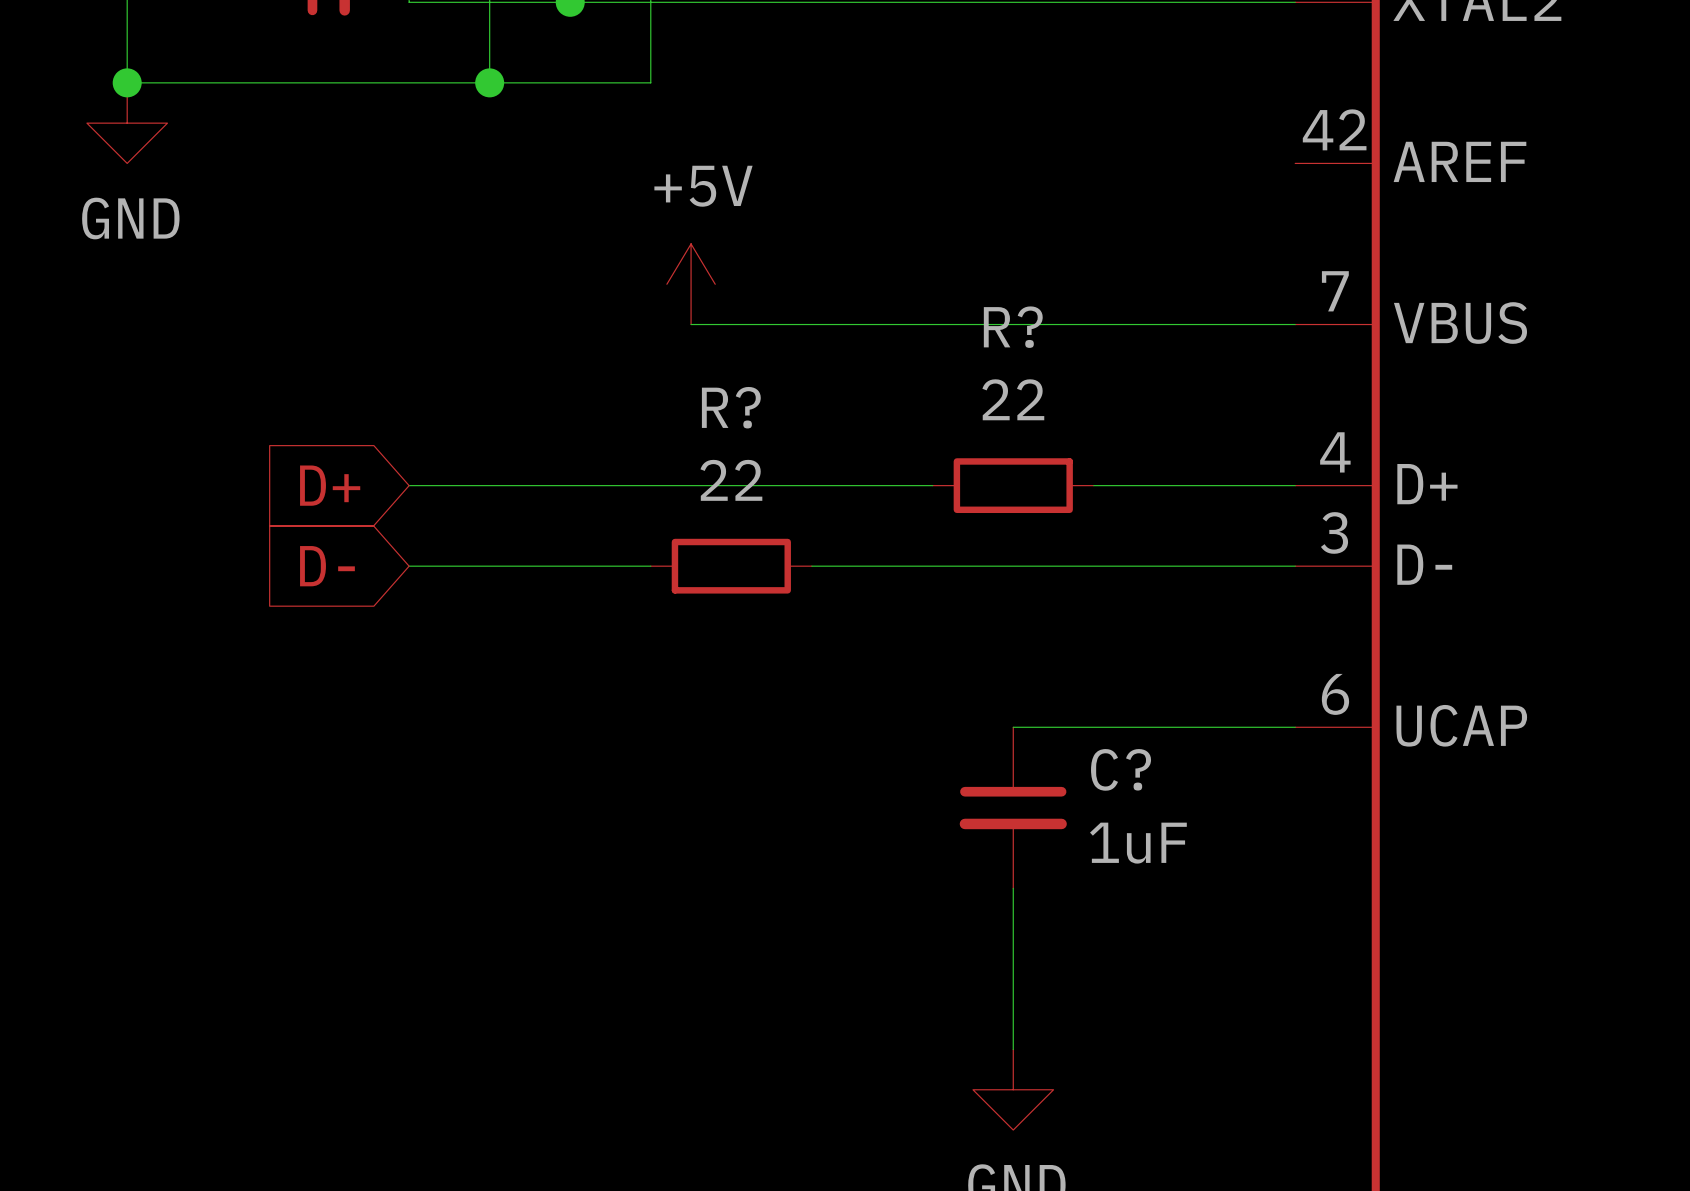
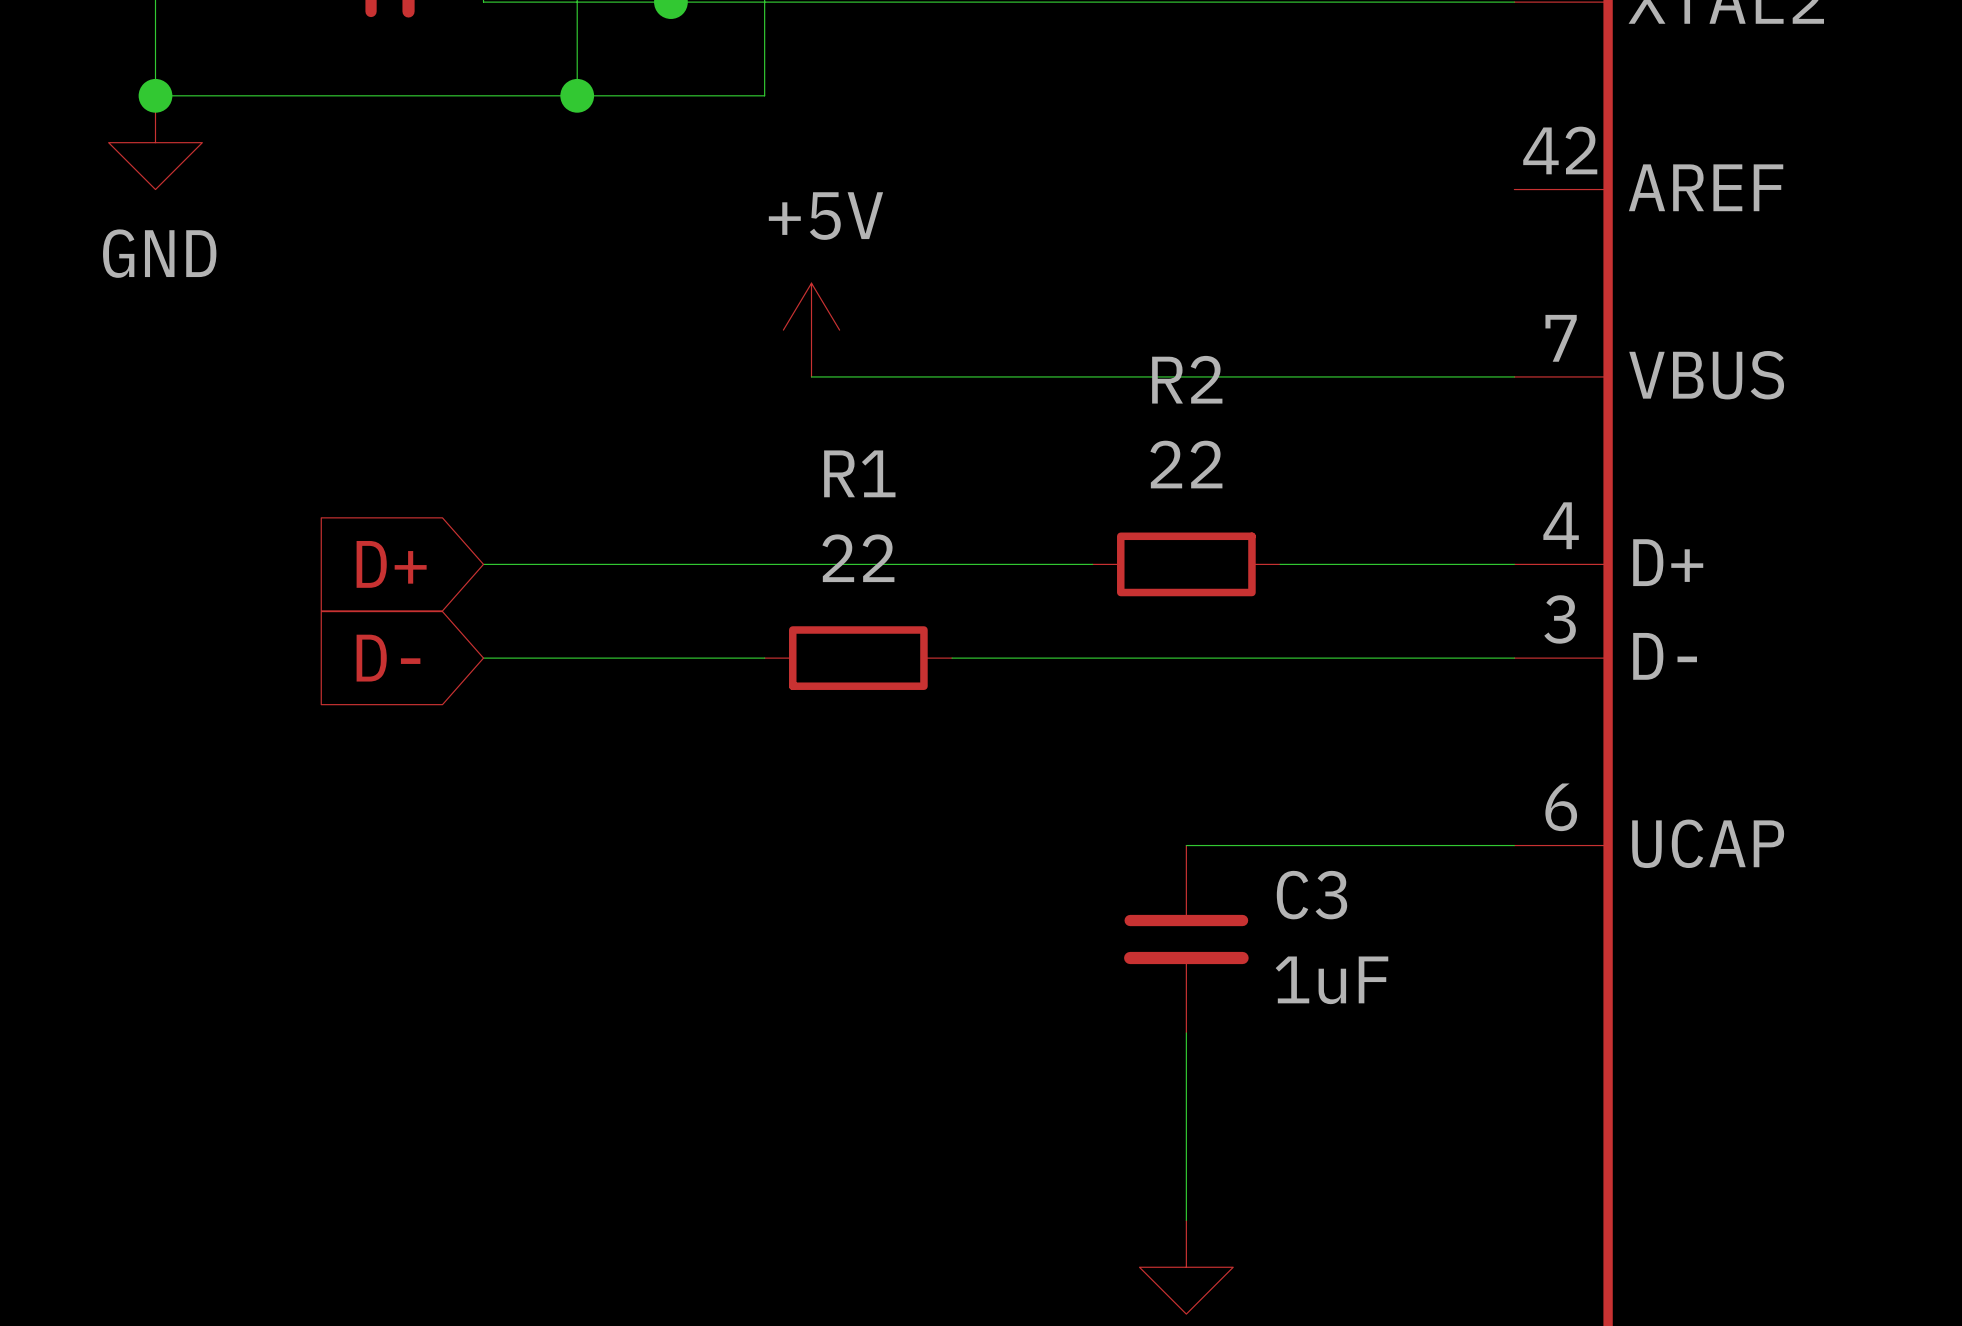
R? name: R? (1013, 327) -> R2 (1187, 379)
R? name: R? (731, 407) -> R1 (859, 473)
C? name: C? (1121, 769) -> C3 (1311, 895)

